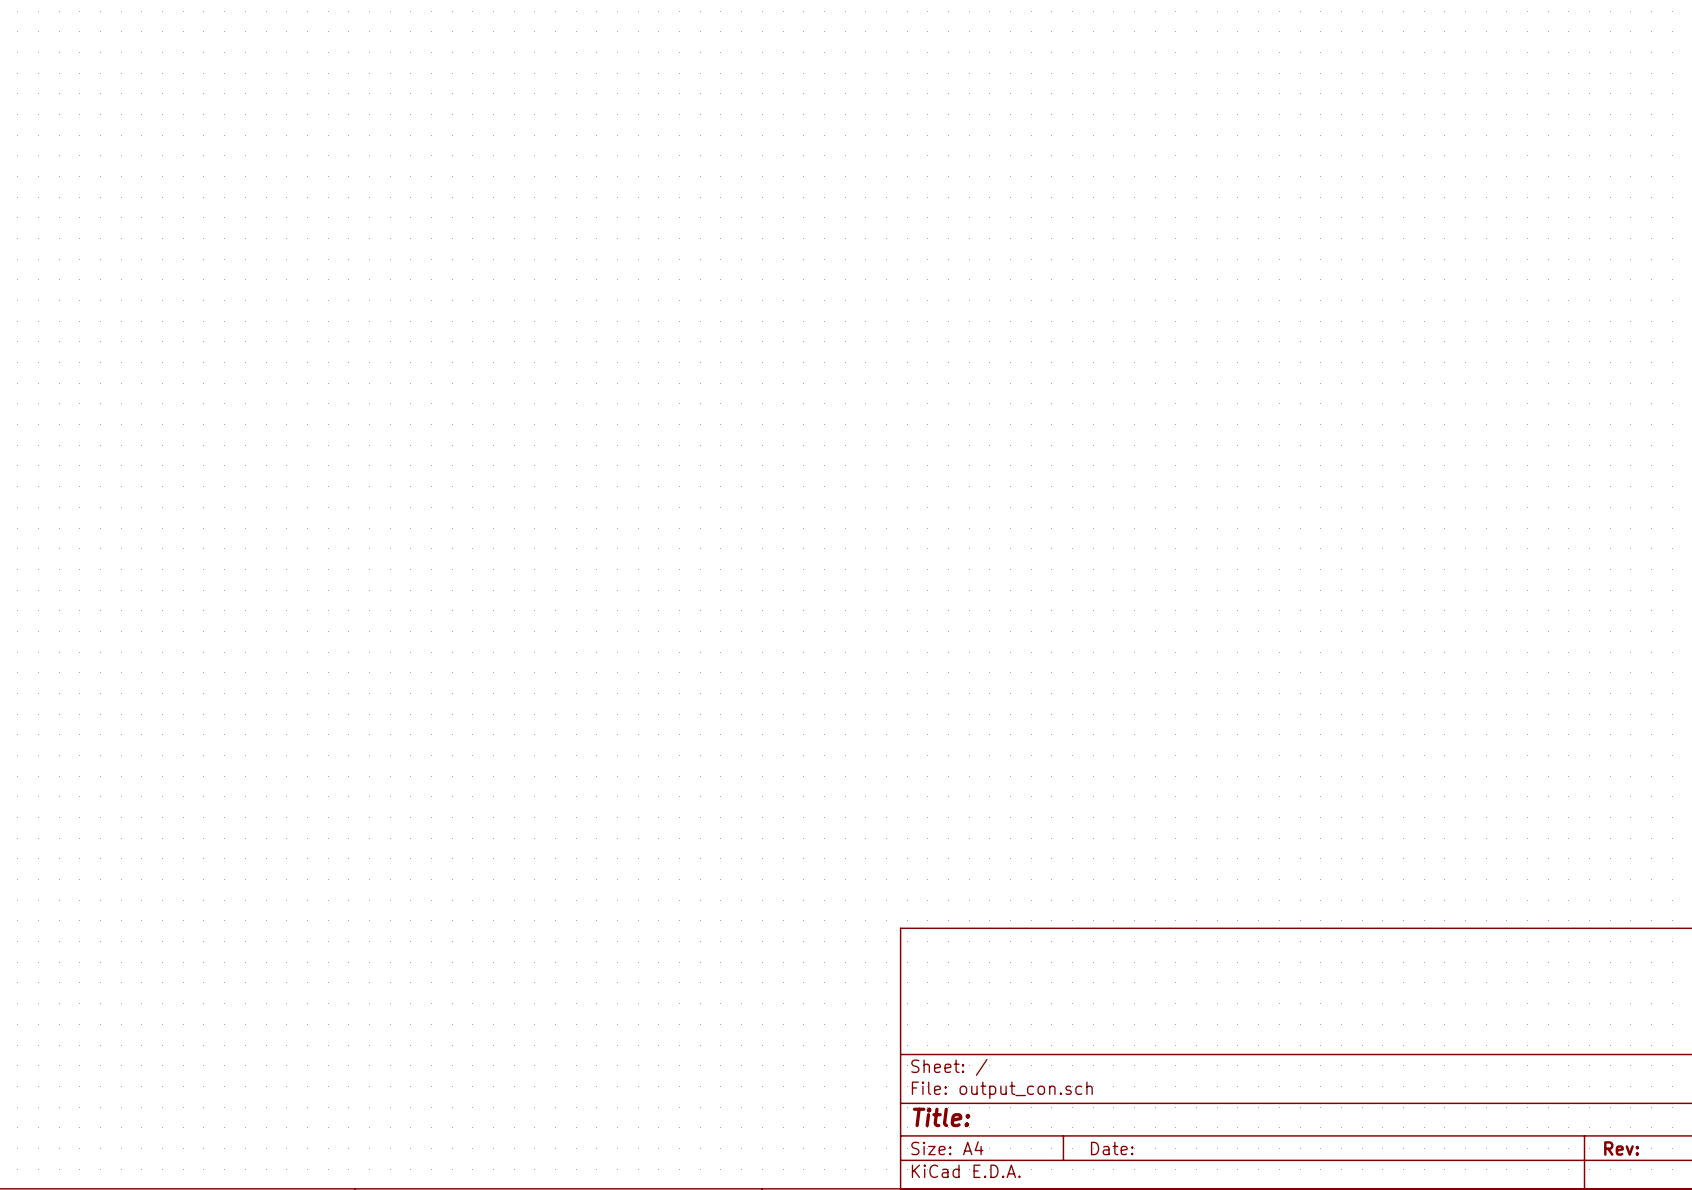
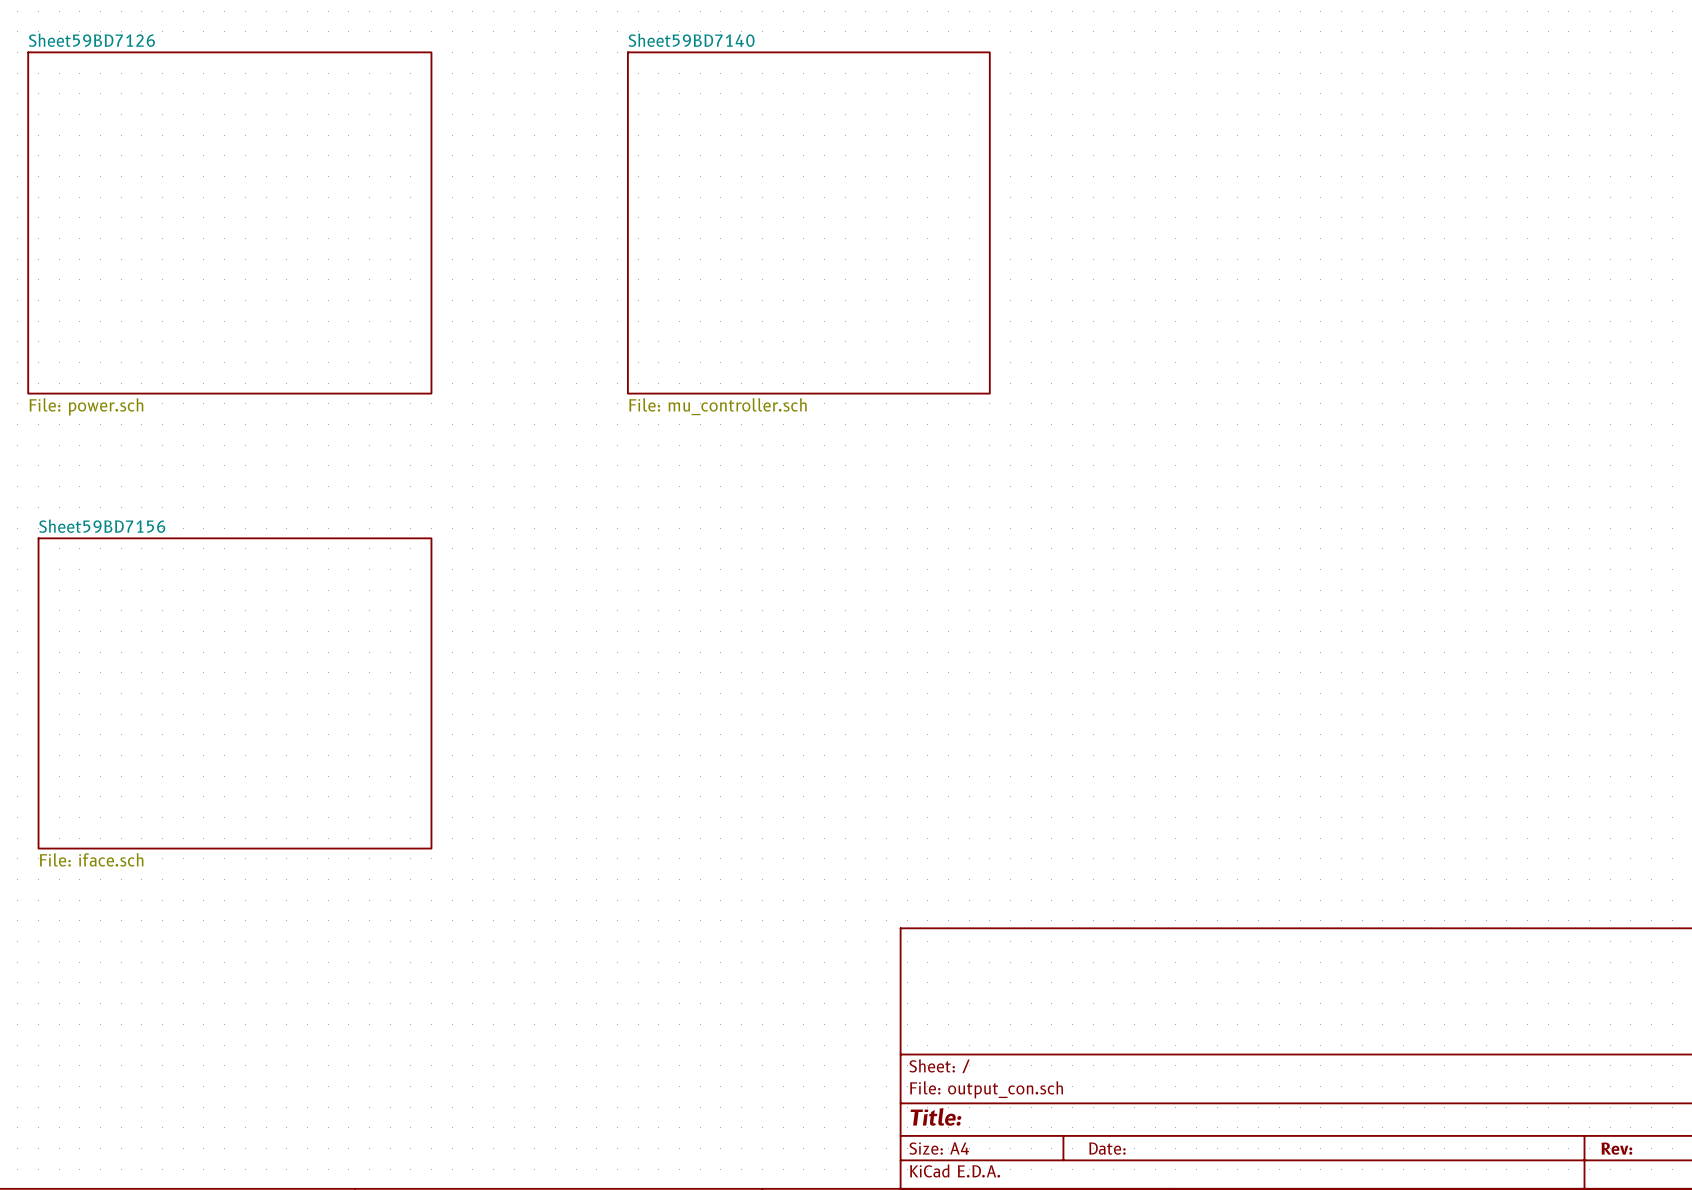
sheet Sheet59BD7126: none -> File: power.sch (229, 222)
sheet Sheet59BD7140: none -> File: mu_controller.sch (808, 222)
sheet Sheet59BD7156: none -> File: iface.sch (234, 693)

